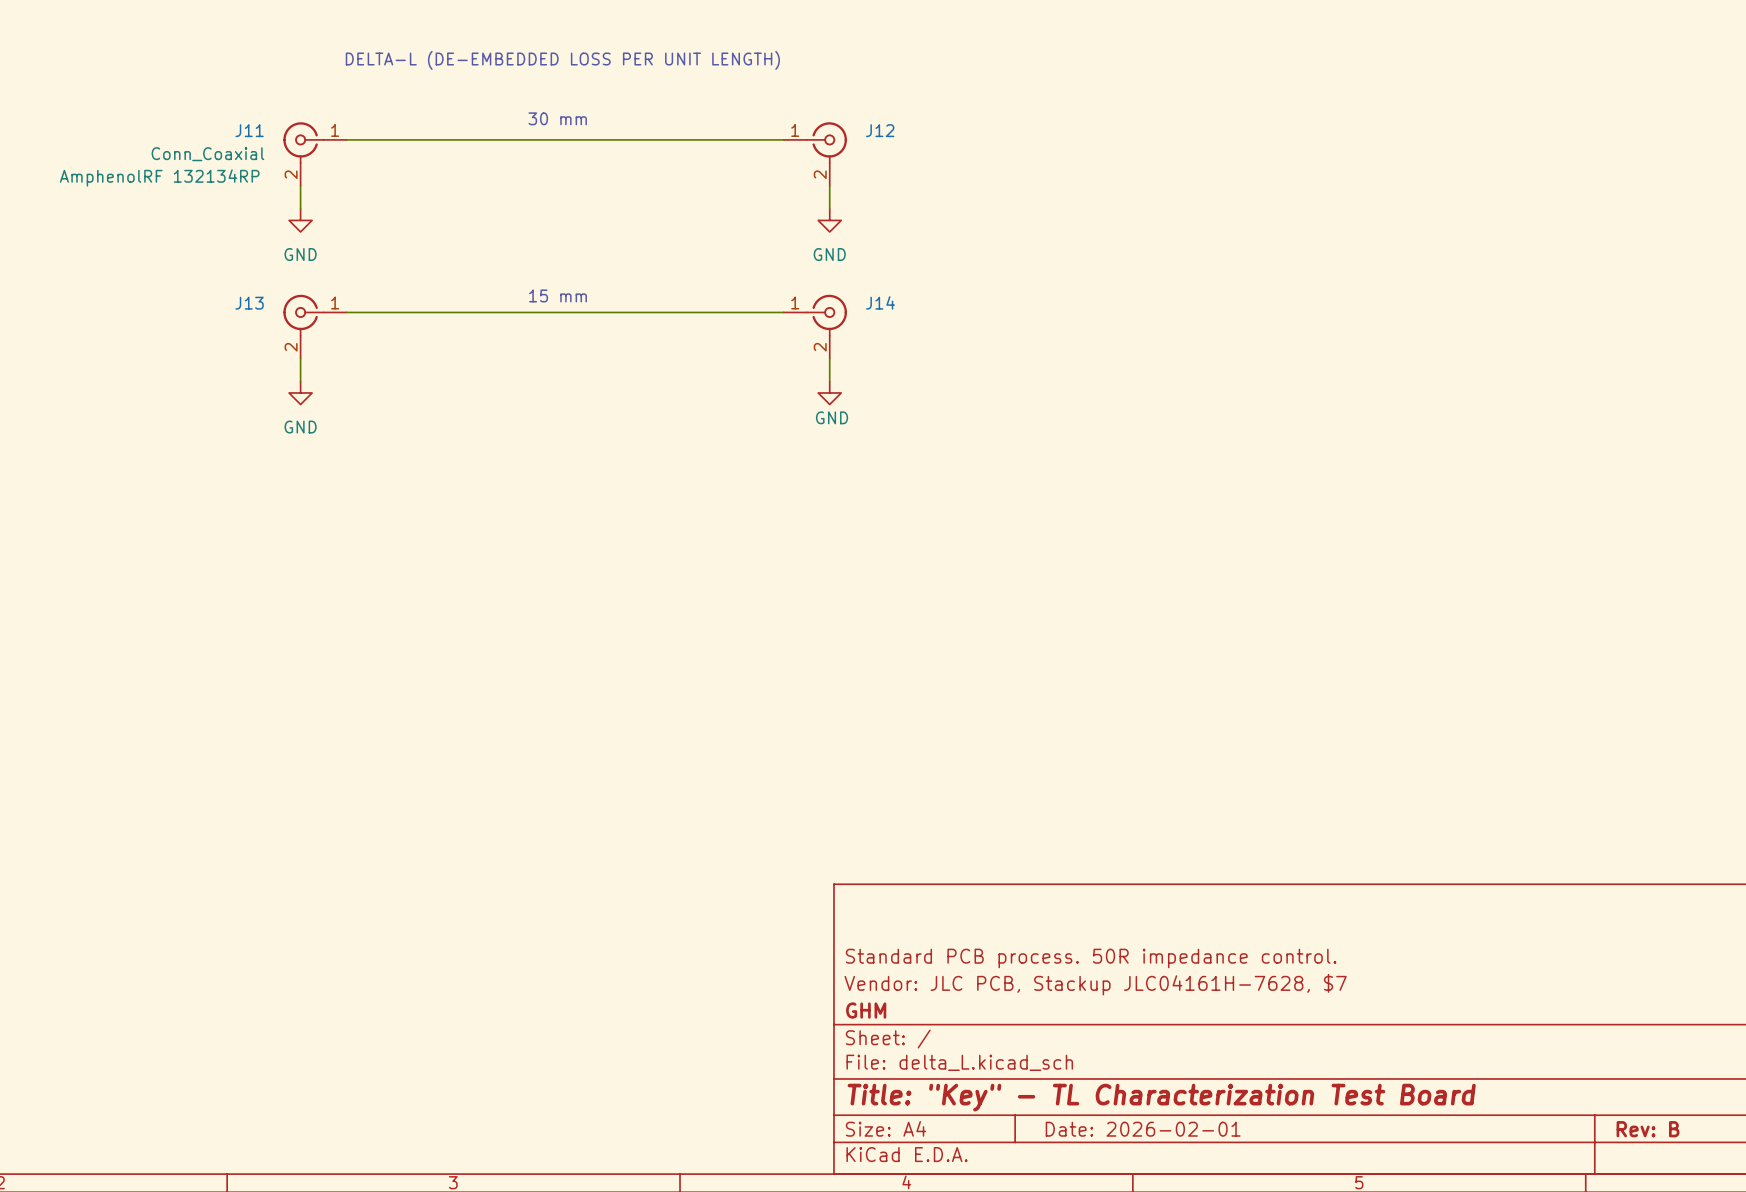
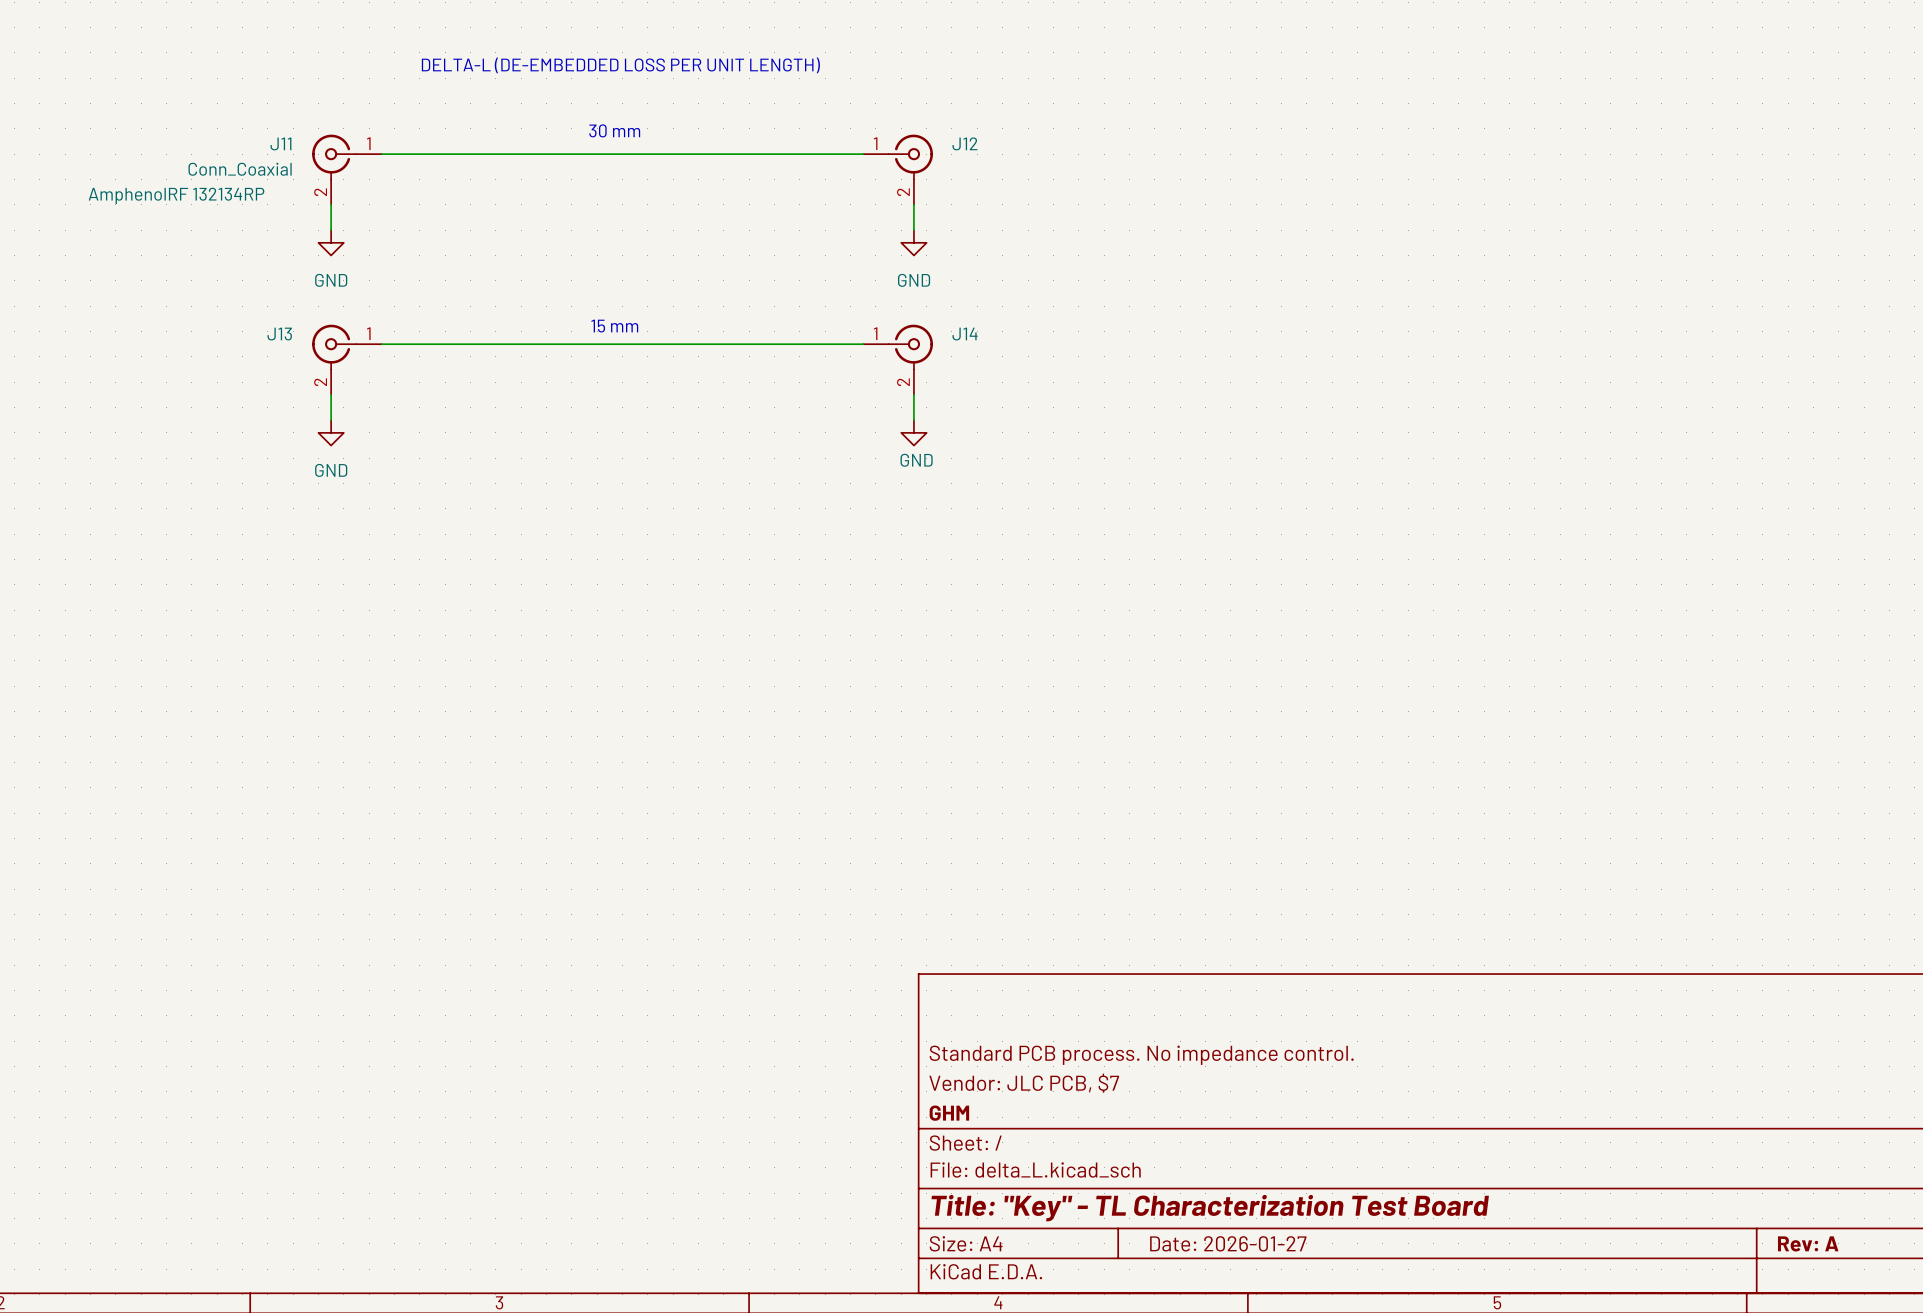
title block: Standard PCB process. 50R impedance control. (1091, 958) -> Standard PCB process. No impedance control. (1141, 1055)
title block: Vendor: JLC PCB, Stackup JLC04161H-7628, $7 (1095, 984) -> Vendor: JLC PCB, $7 (1024, 1083)
title block: Date: 2026-02-01 (1143, 1129) -> Date: 2026-01-27 (1228, 1243)
title block: Rev: B (1648, 1129) -> Rev: A (1808, 1243)

